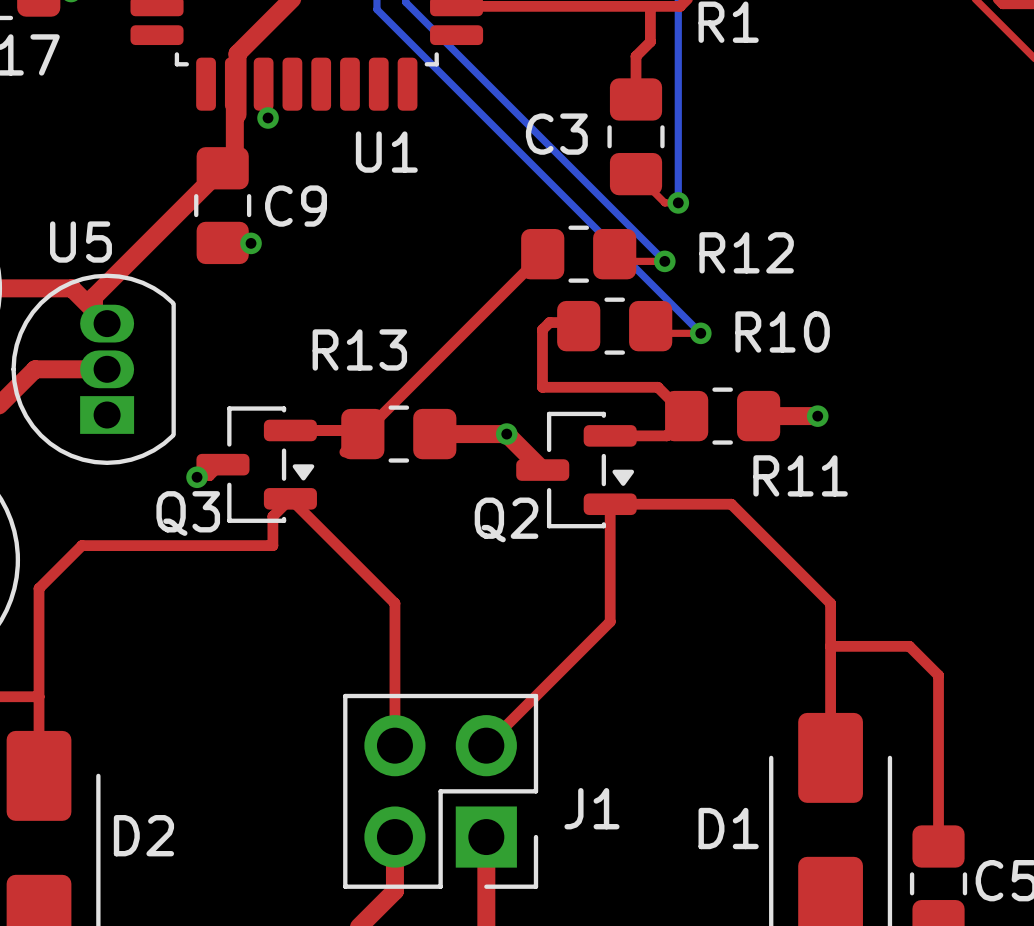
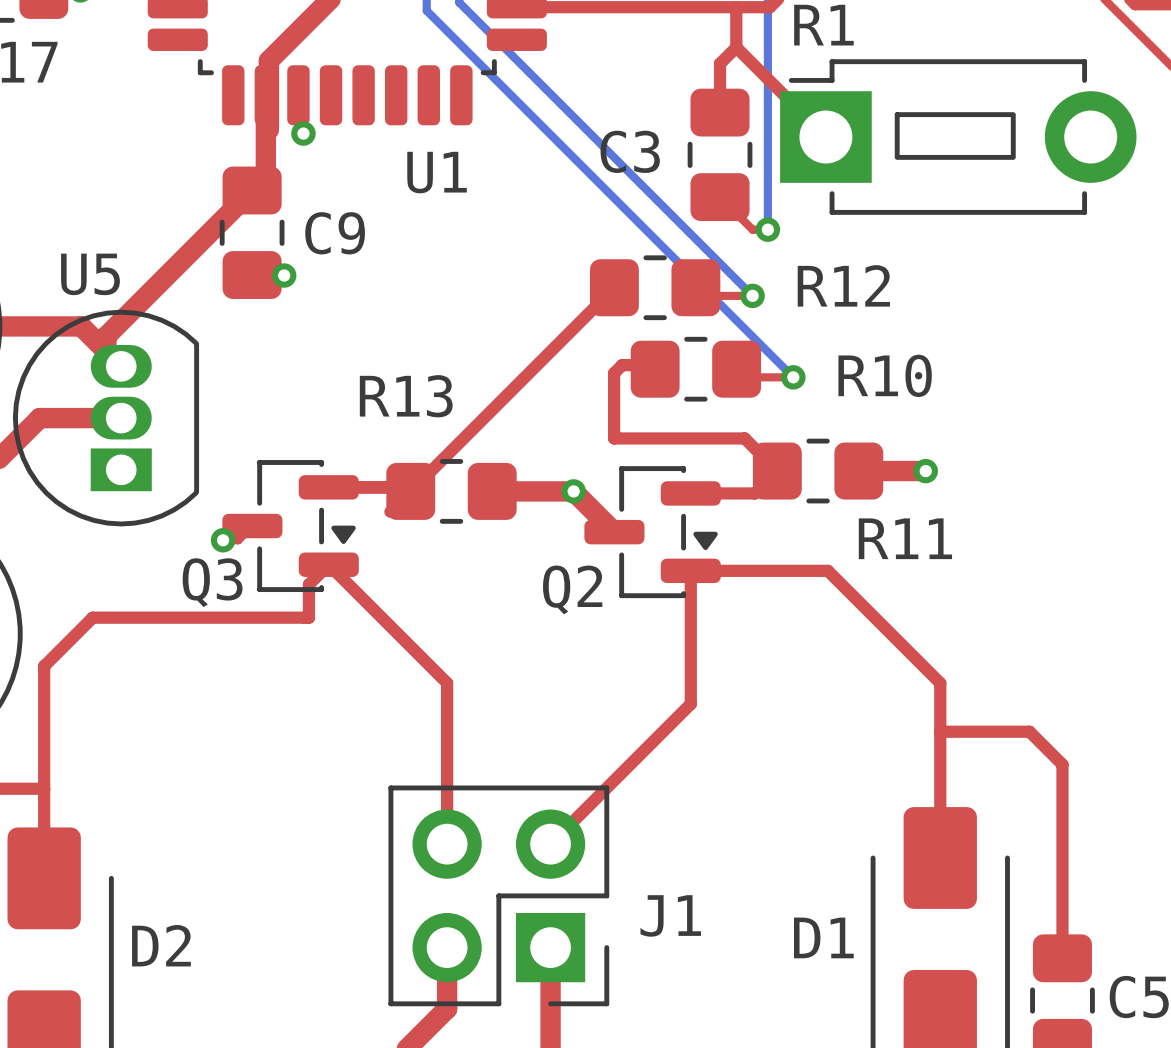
top track: none -> (736, 47) (825, 137)
part: none -> (958, 137)

